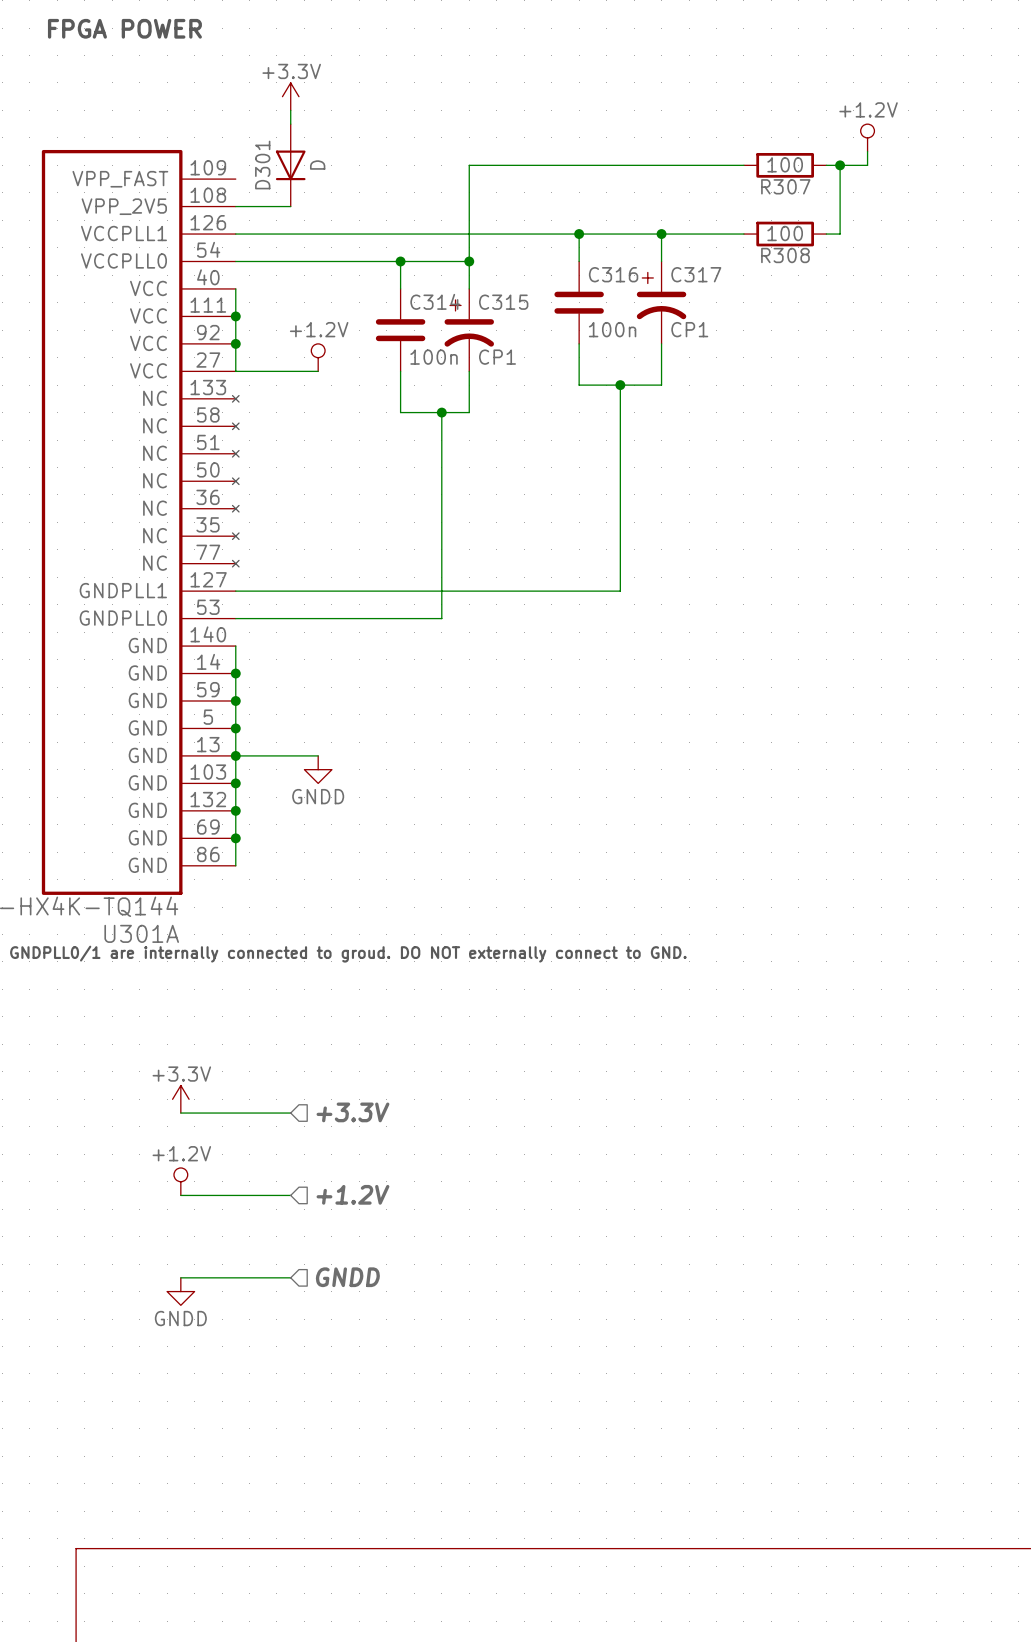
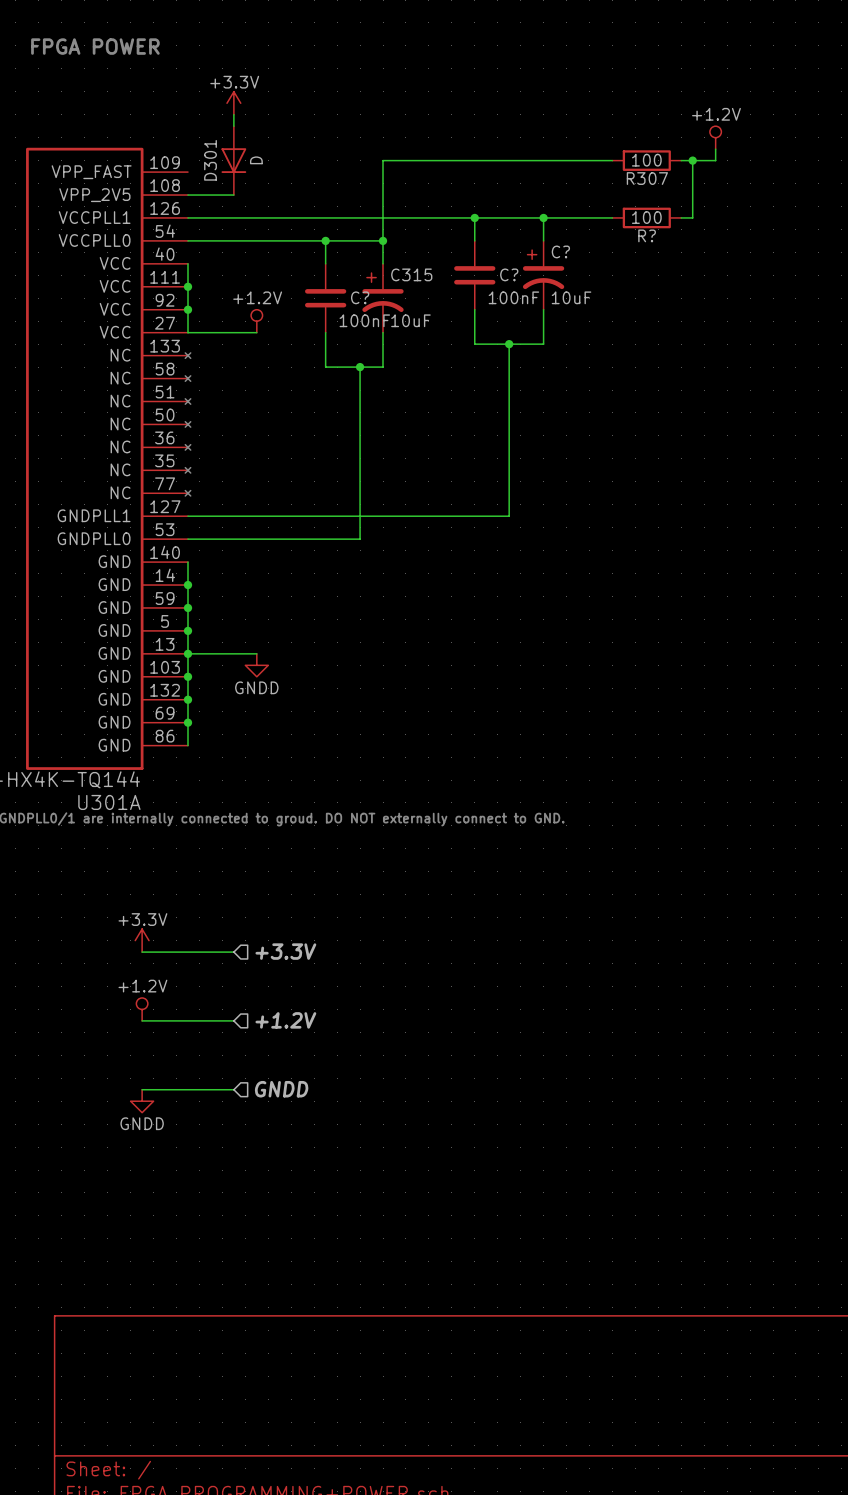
R308 name: R308 (785, 255) -> R? (647, 235)
C316 name: C316 (613, 274) -> C? (509, 274)
C317 name: C317 (696, 274) -> C? (560, 251)
C314 name: C314 (435, 301) -> C? (360, 297)
C316 value: 100n (612, 329) -> 100nF (513, 297)
C317 value: CP1 (689, 329) -> 10uF (571, 297)
C314 value: 100n (434, 357) -> 100nF (364, 320)
C315 value: CP1 (497, 357) -> 10uF (410, 320)

